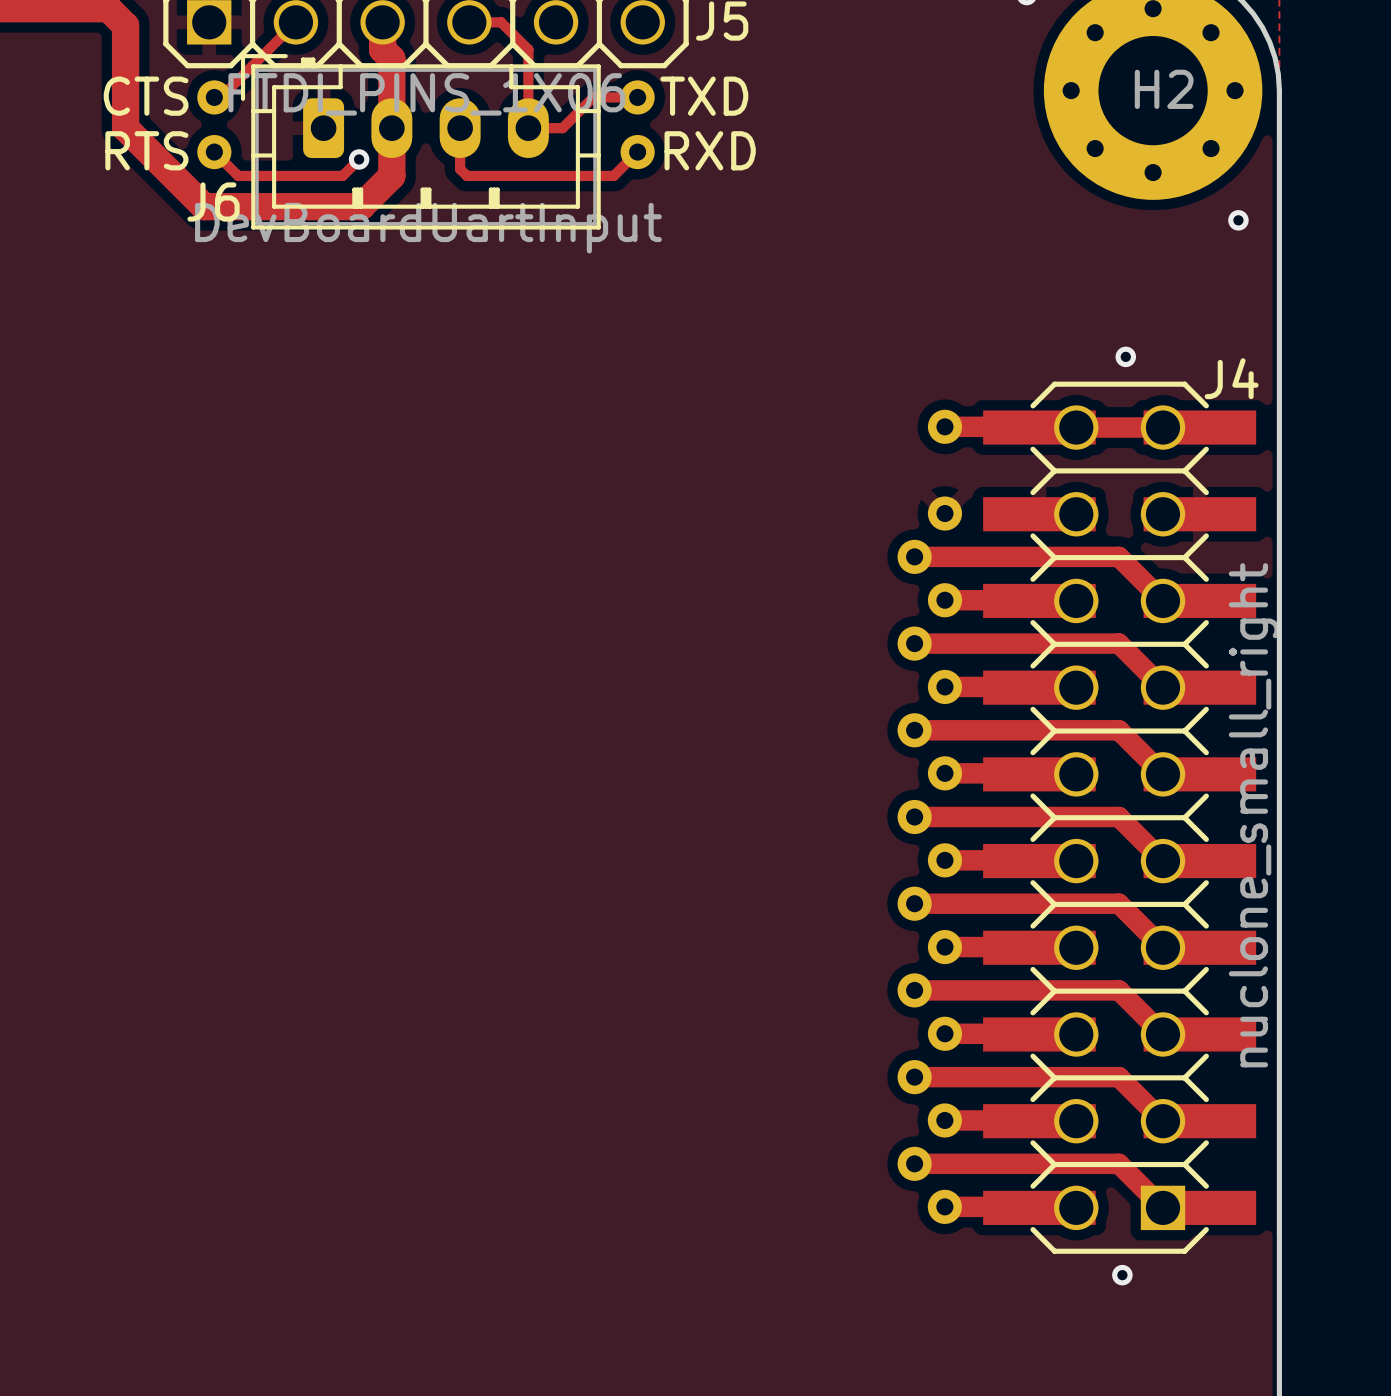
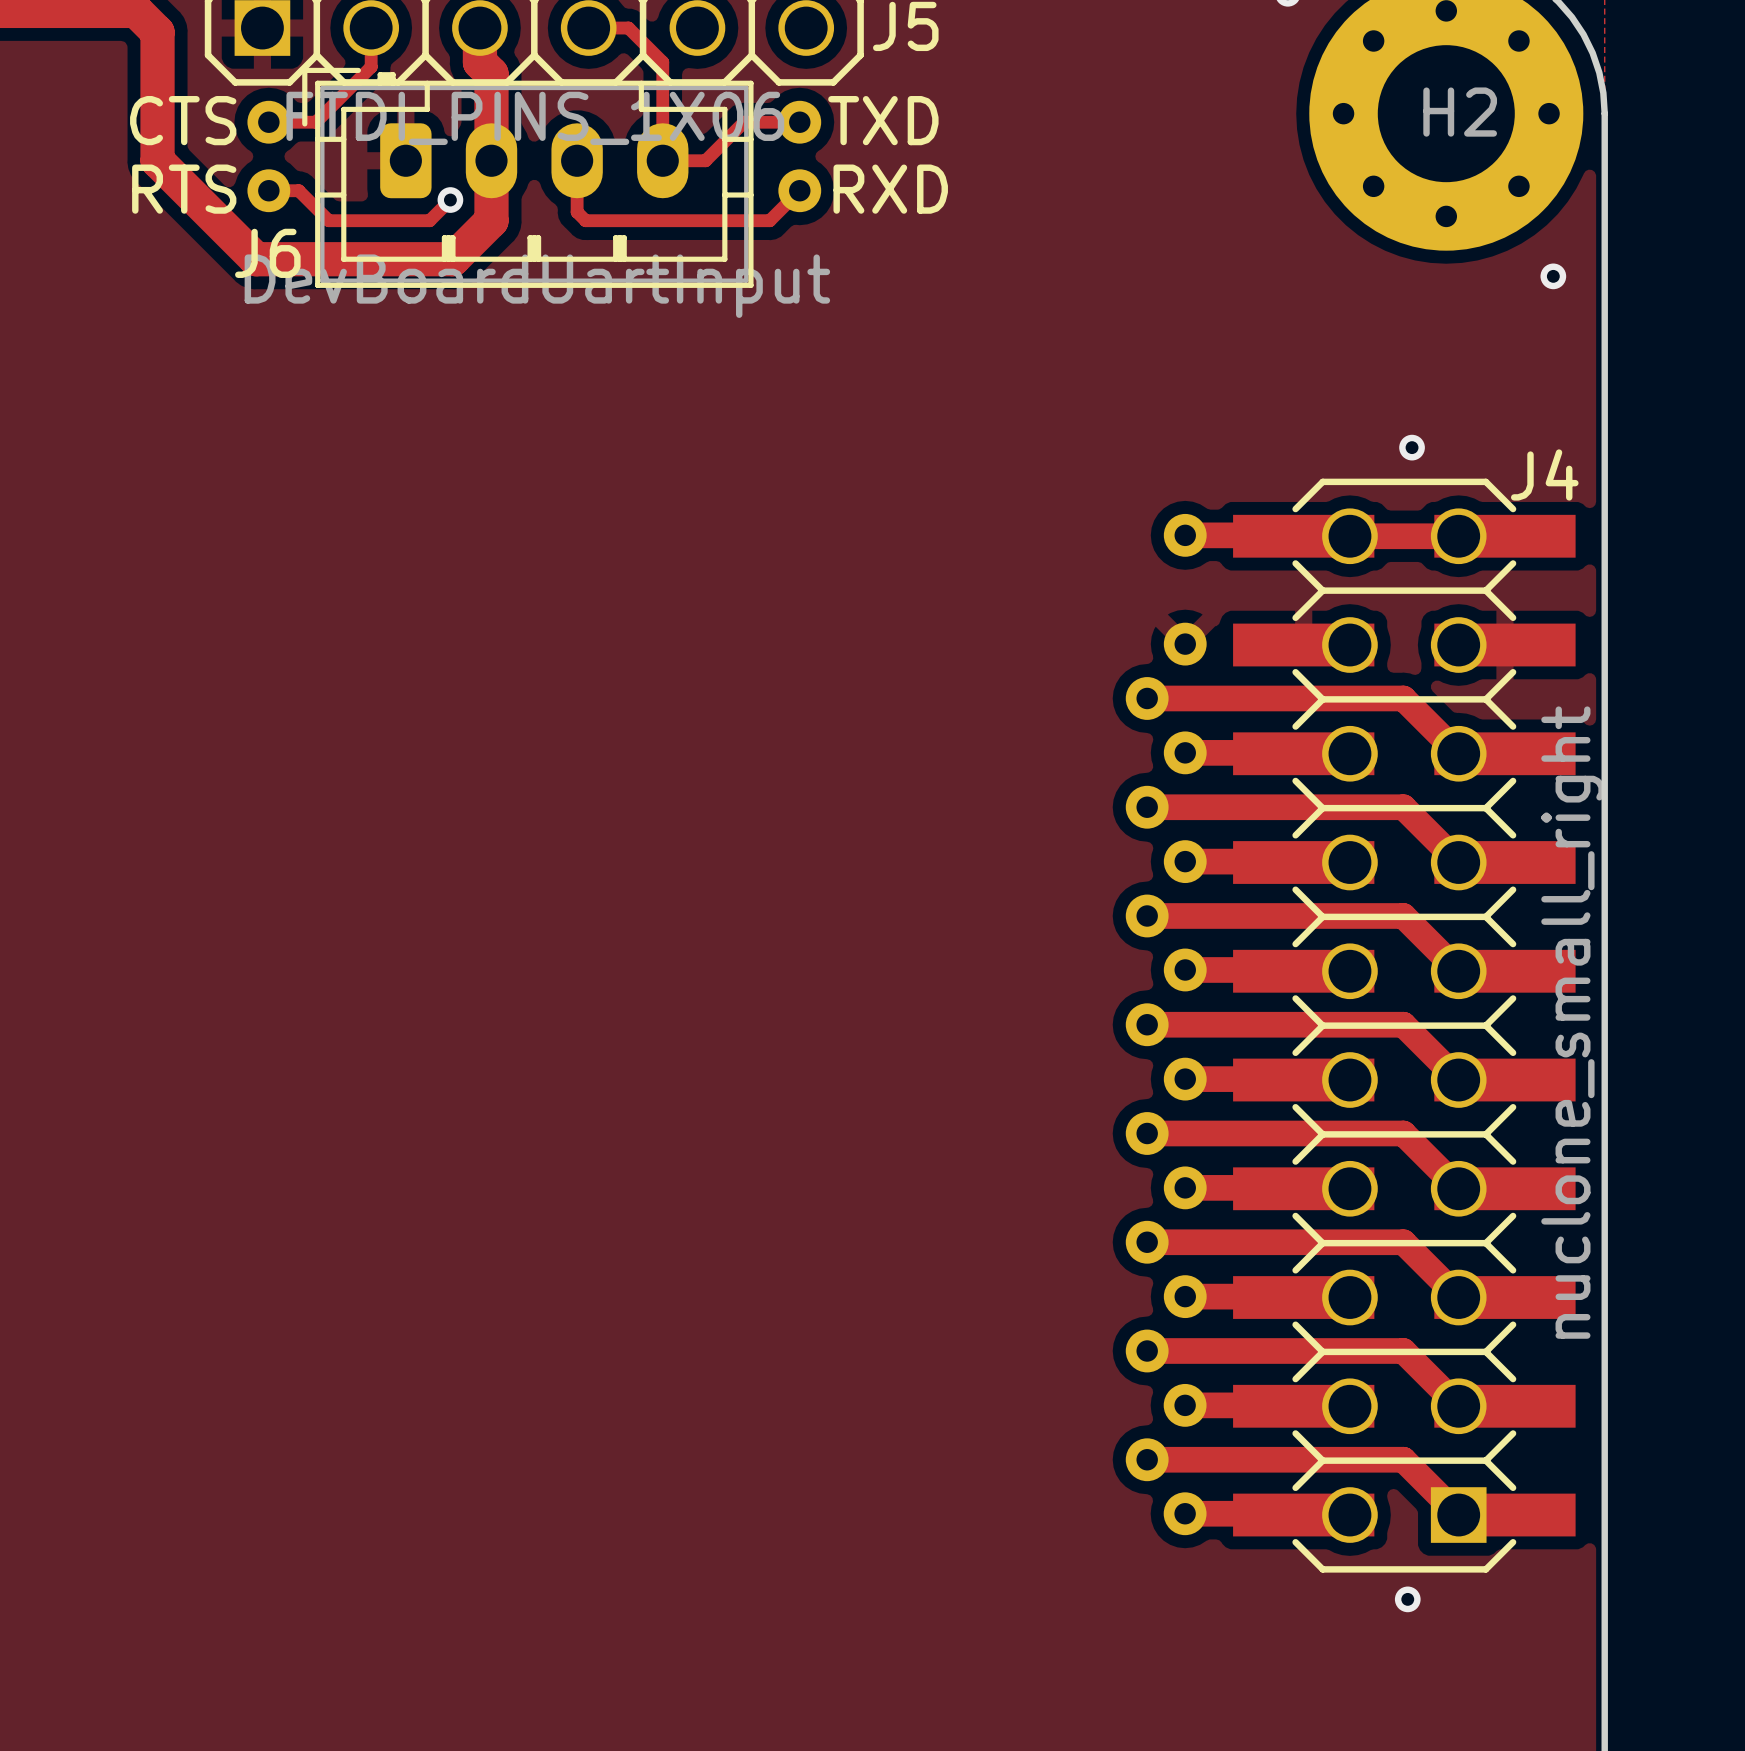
track: (295, 22) (220, 97) -> (371, 28) (371, 66) (315, 122) (276, 122)
track: (214, 152) (238, 175) (262, 175) -> (268, 190) (298, 190) (328, 220)

